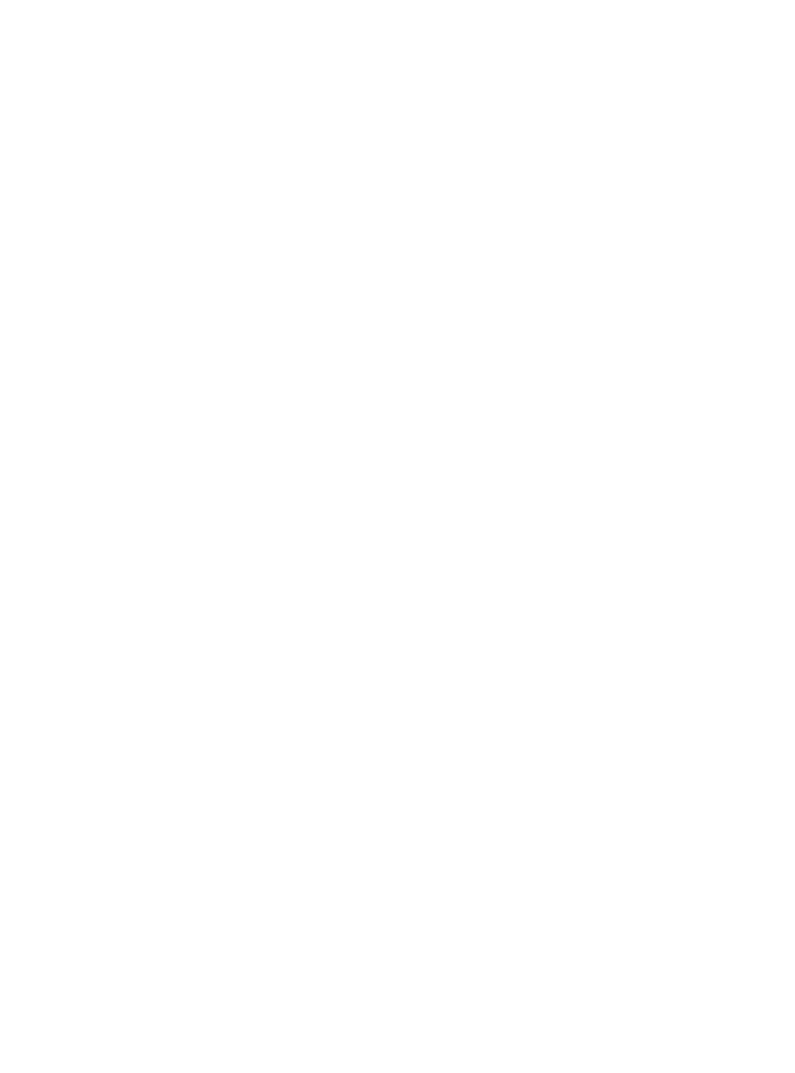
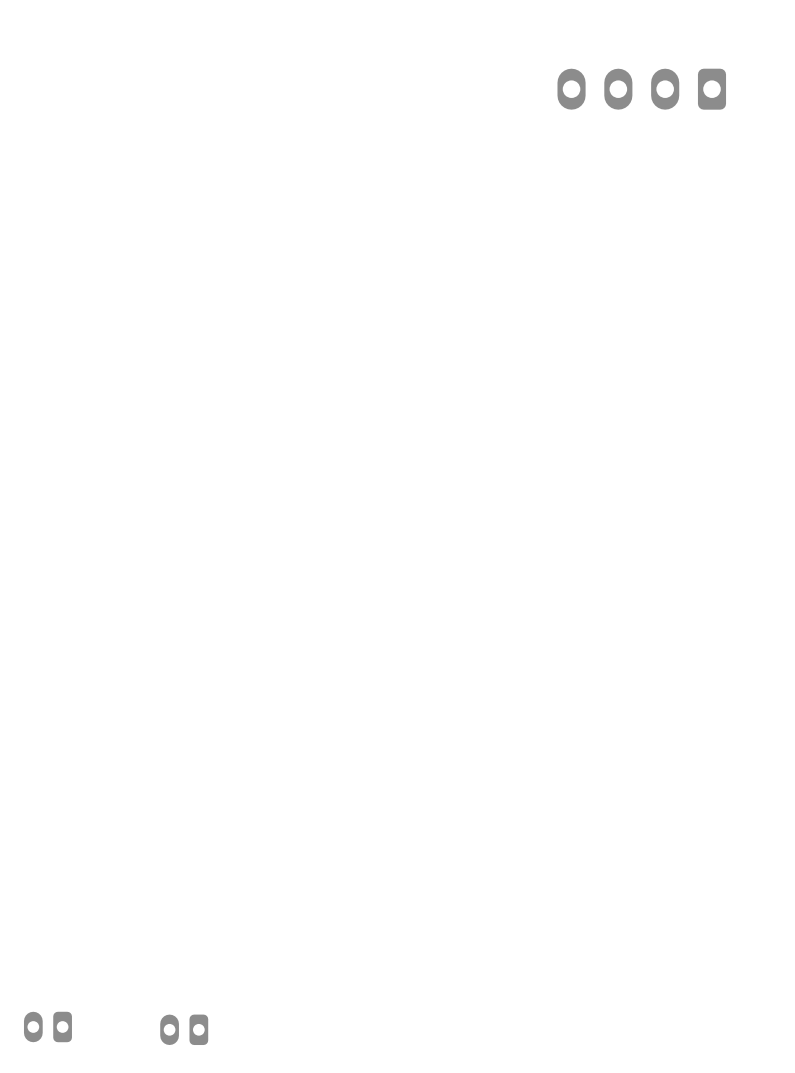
part: none -> (641, 89)
part: none -> (47, 1026)
part: none -> (184, 1029)

